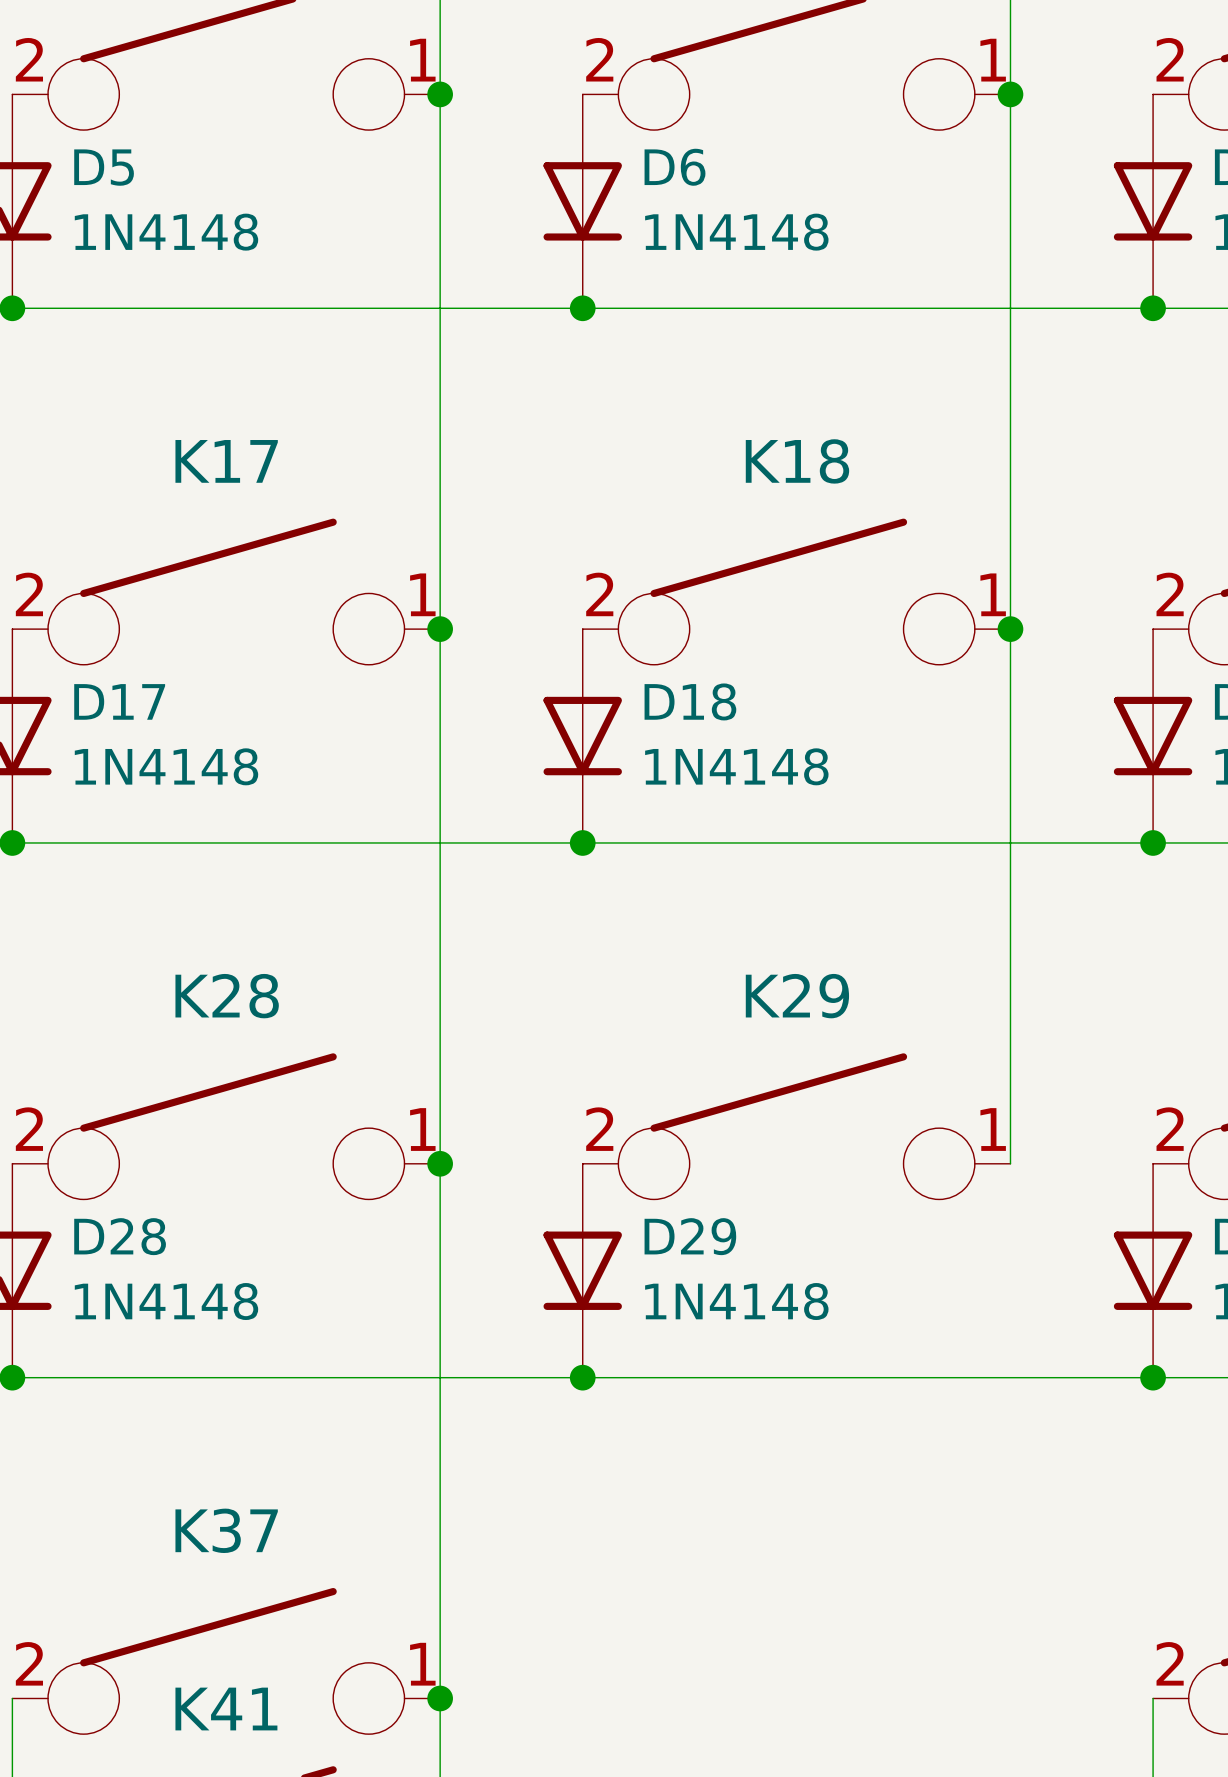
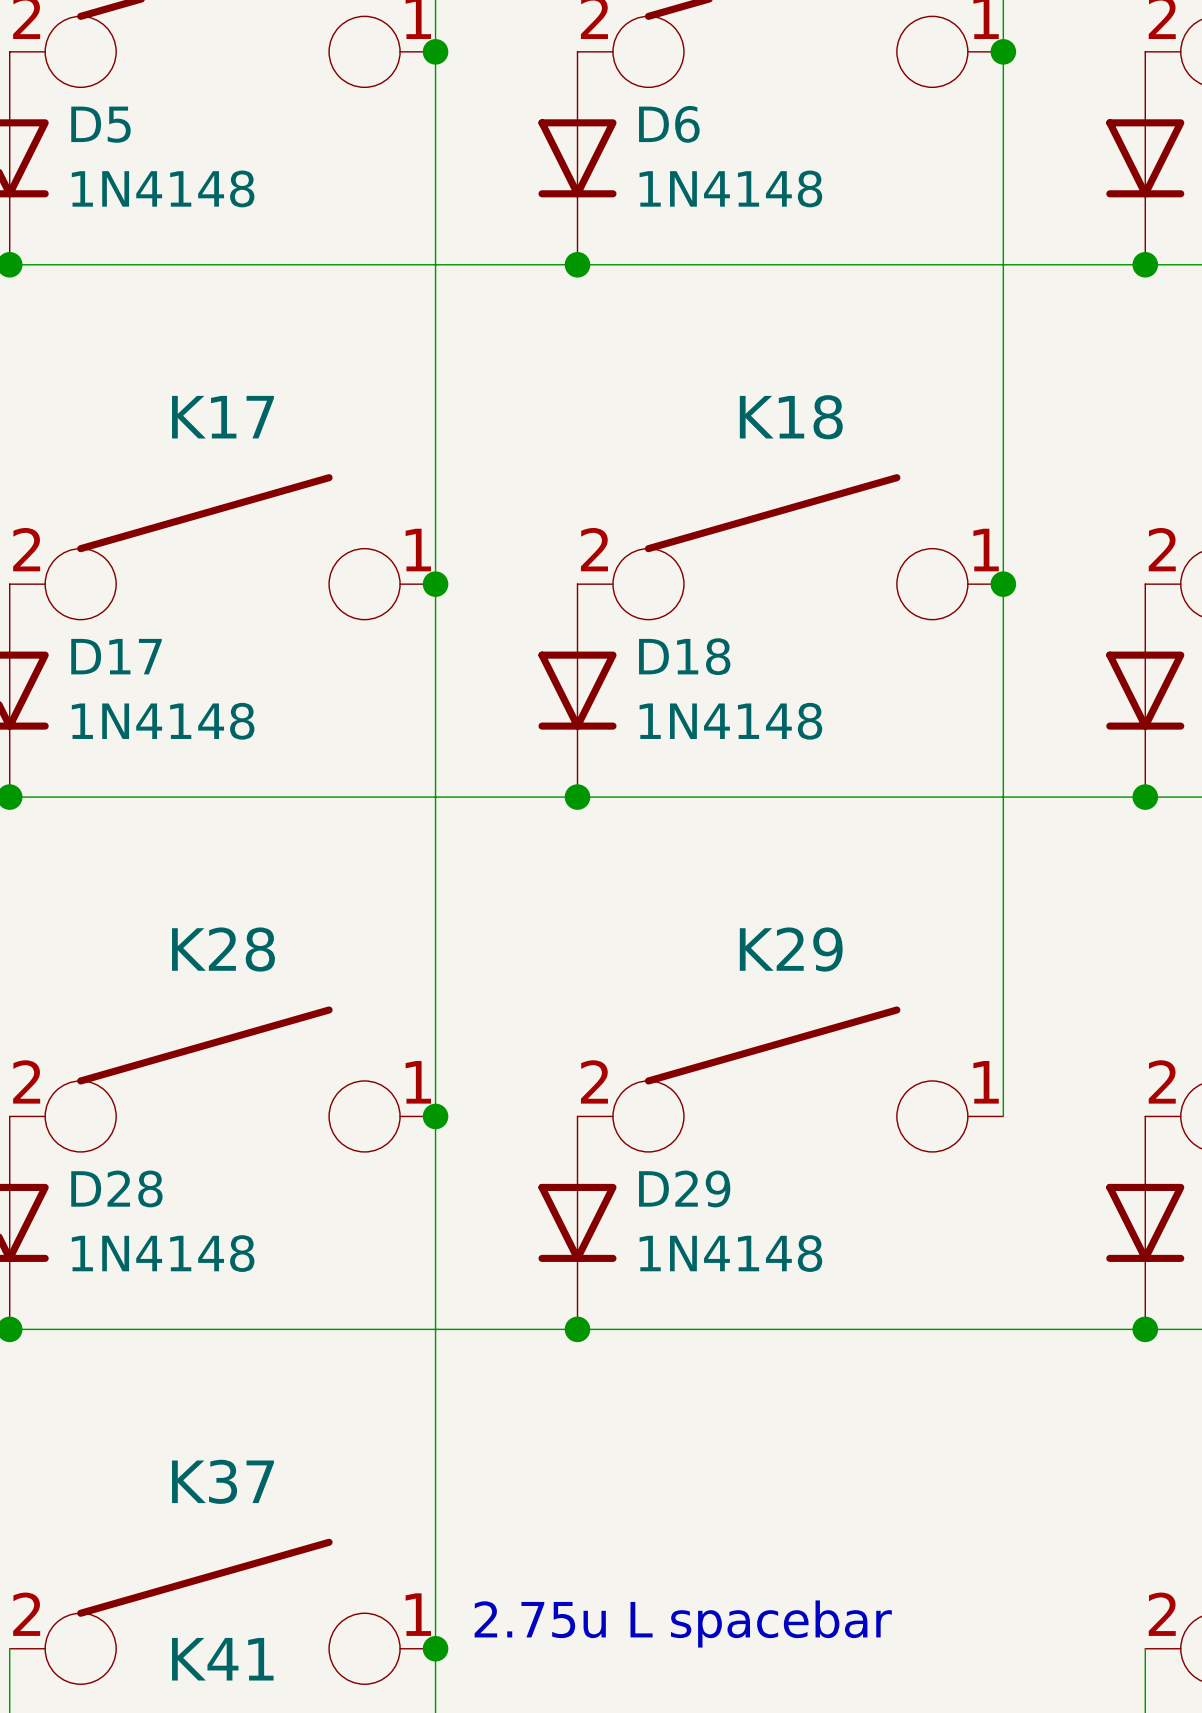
text: none -> 2.75u L spacebar (683, 1623)

